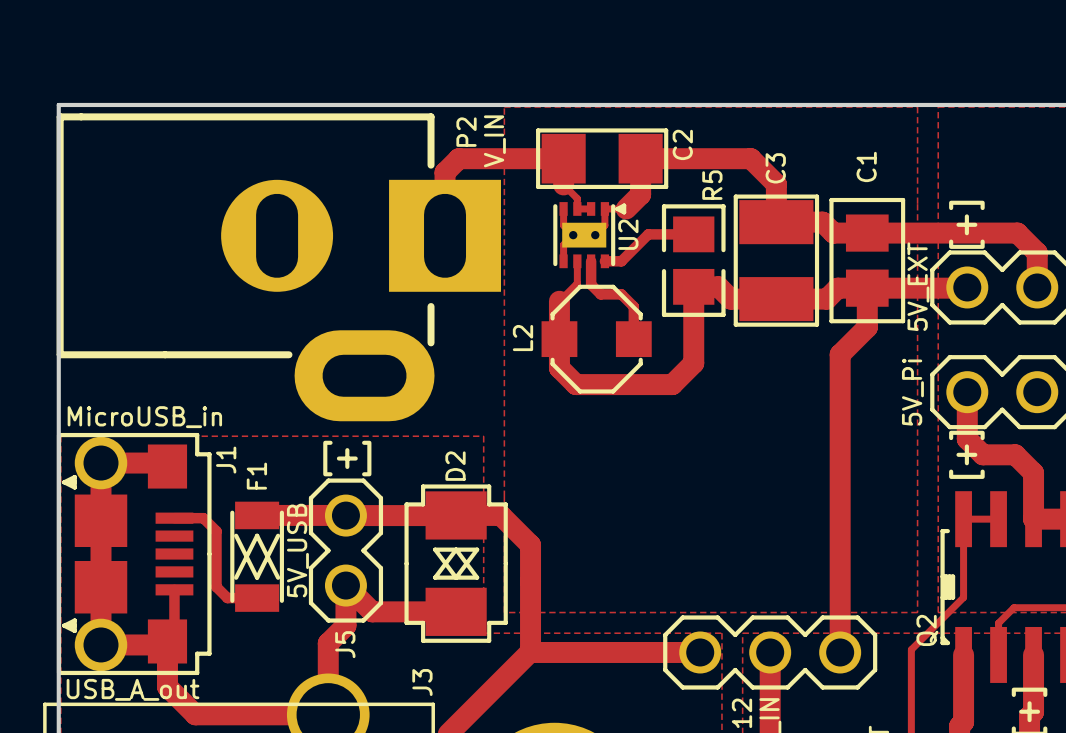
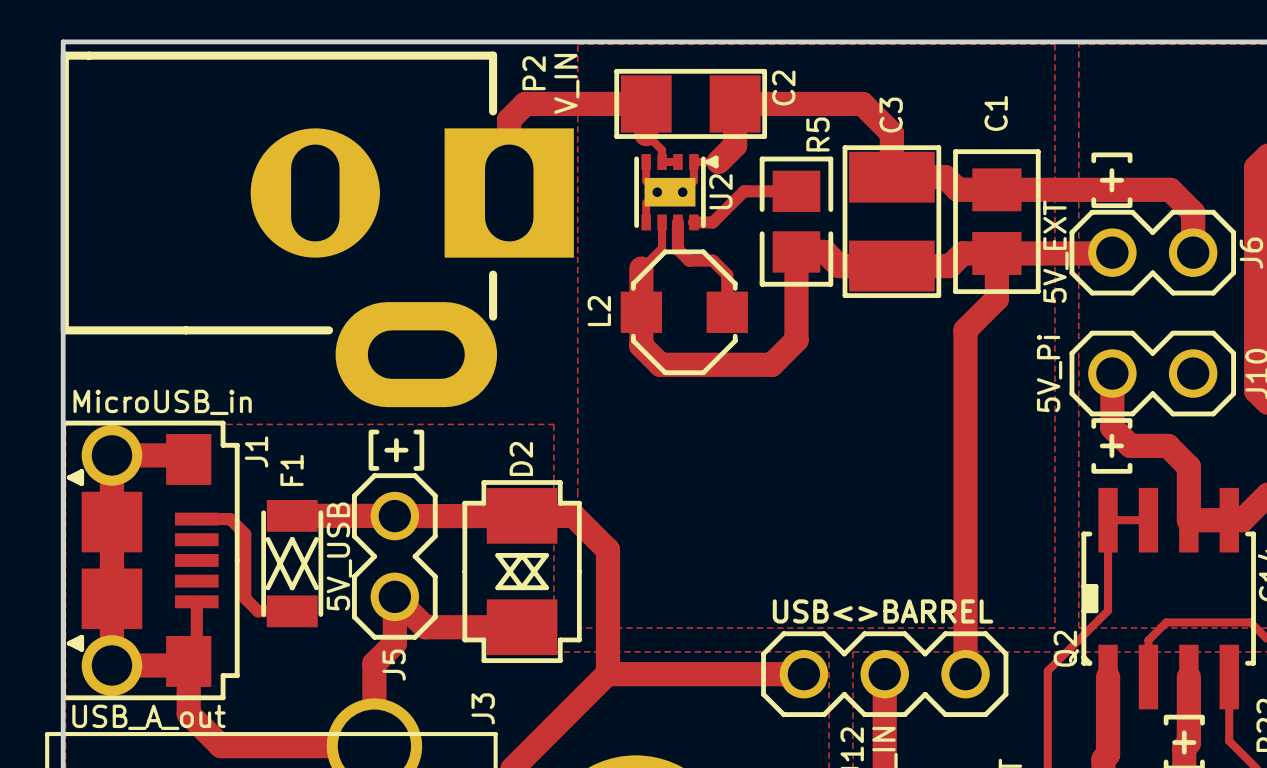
text: none -> USB<>BARREL (883, 611)

